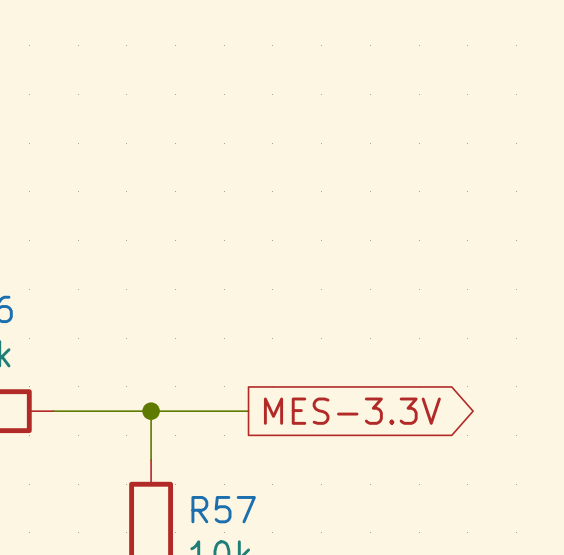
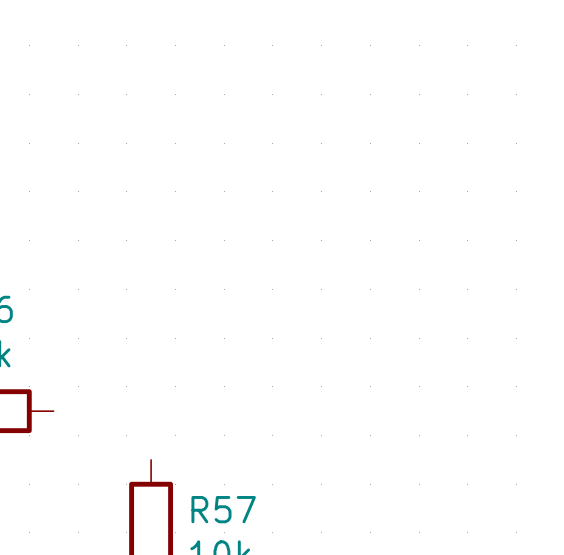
wire: (53, 411) (248, 411) -> none
wire: (151, 411) (151, 459) -> none
junction: (151, 411) -> none
global label: MES-3.3V (352, 411) -> none

